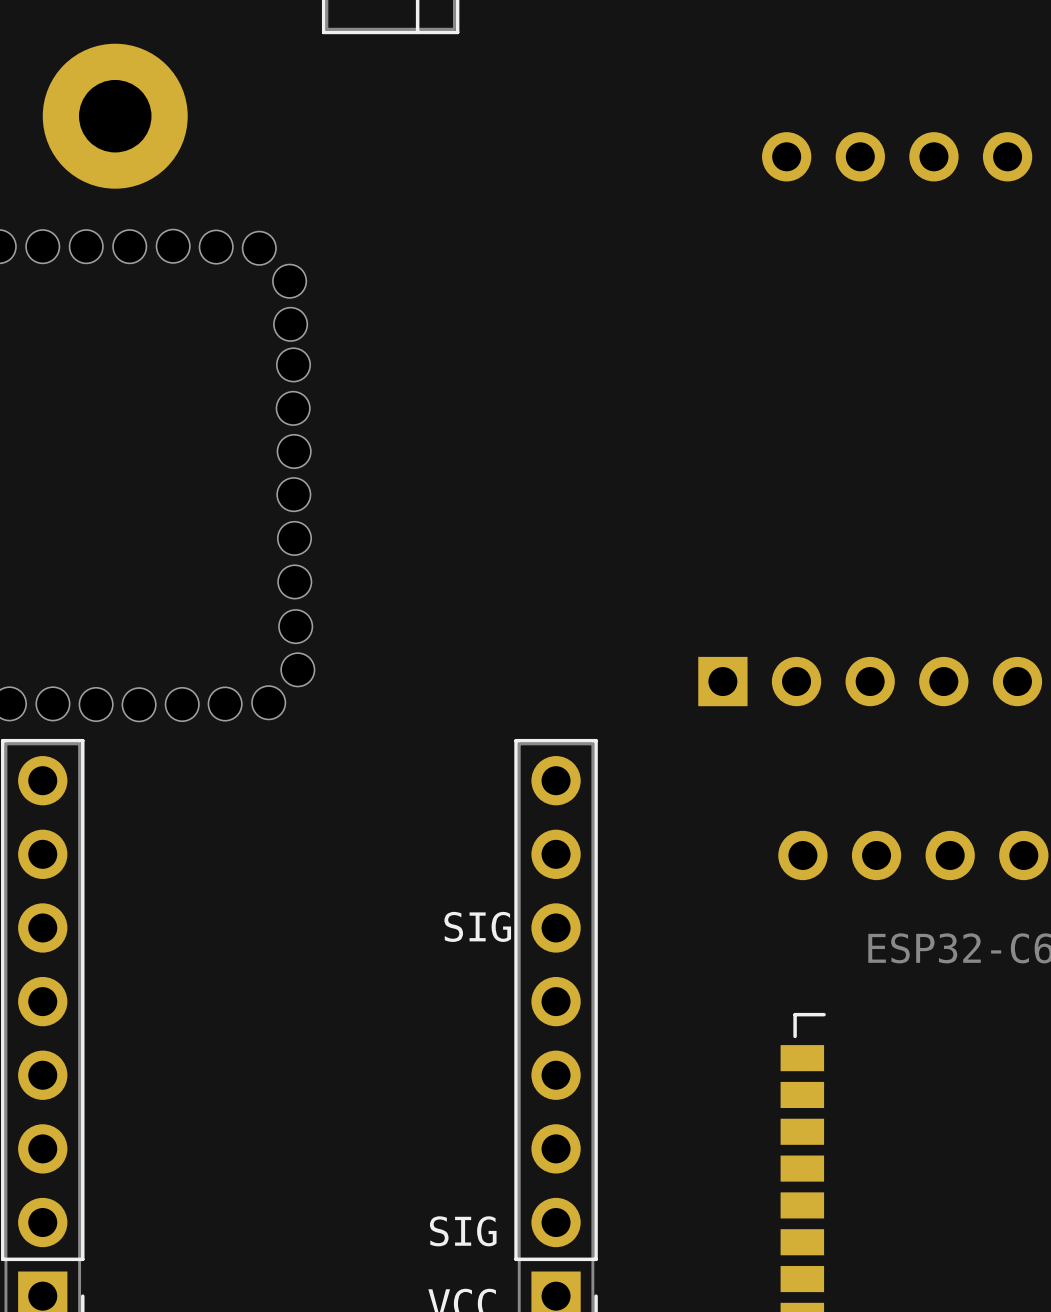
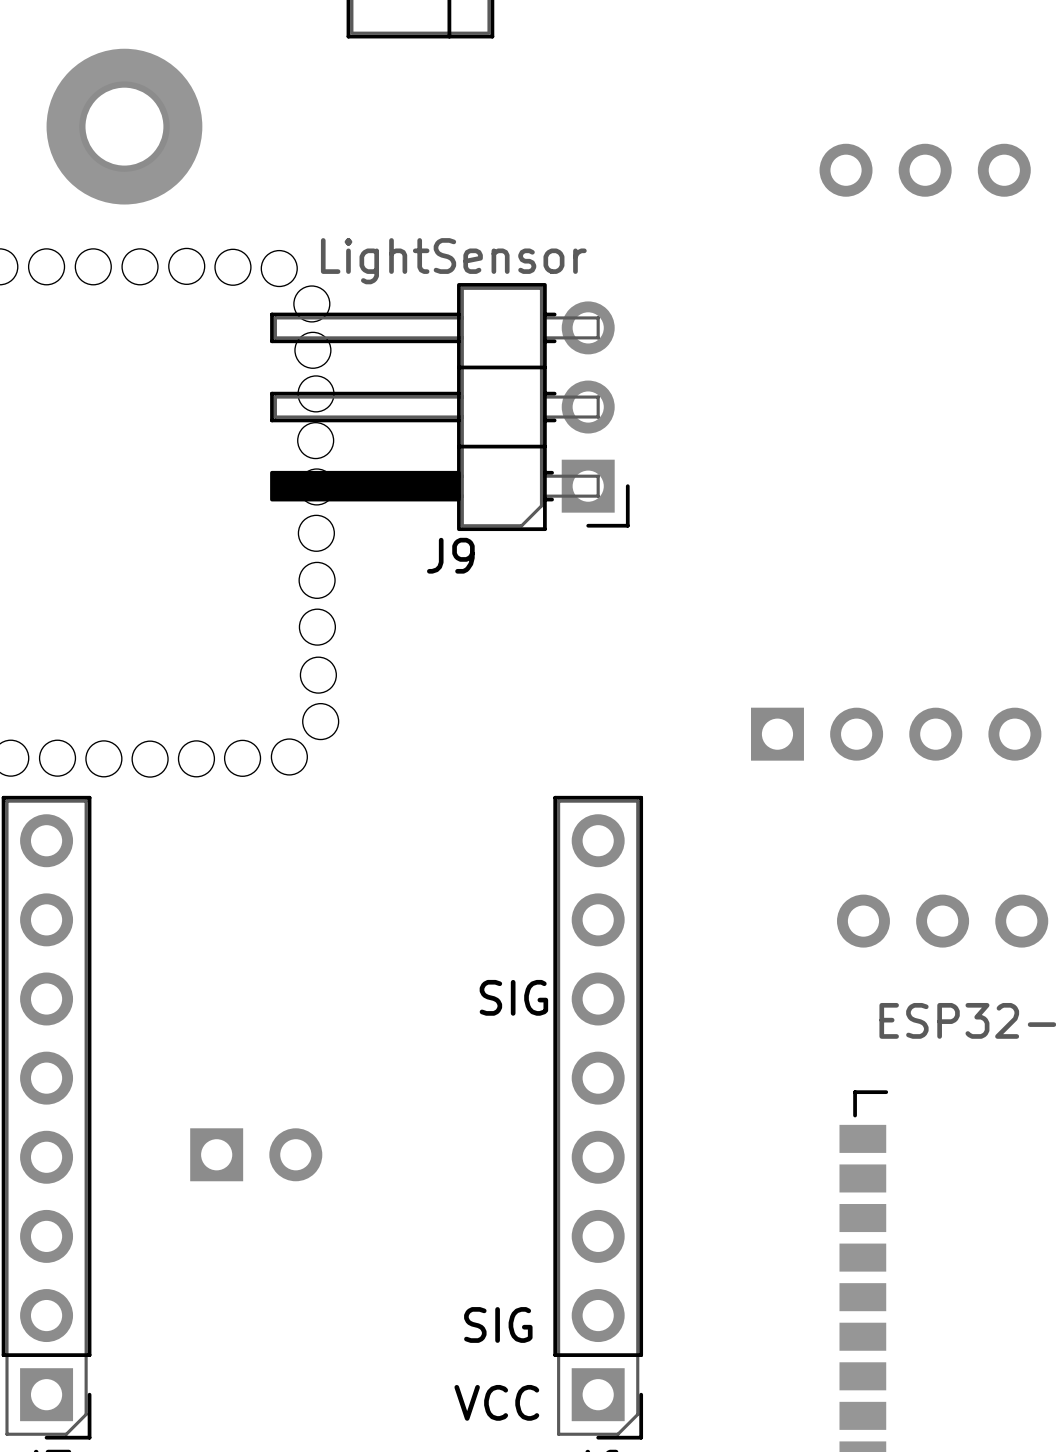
J9: none -> LightSensor (449, 407)
part: none -> (256, 1154)

